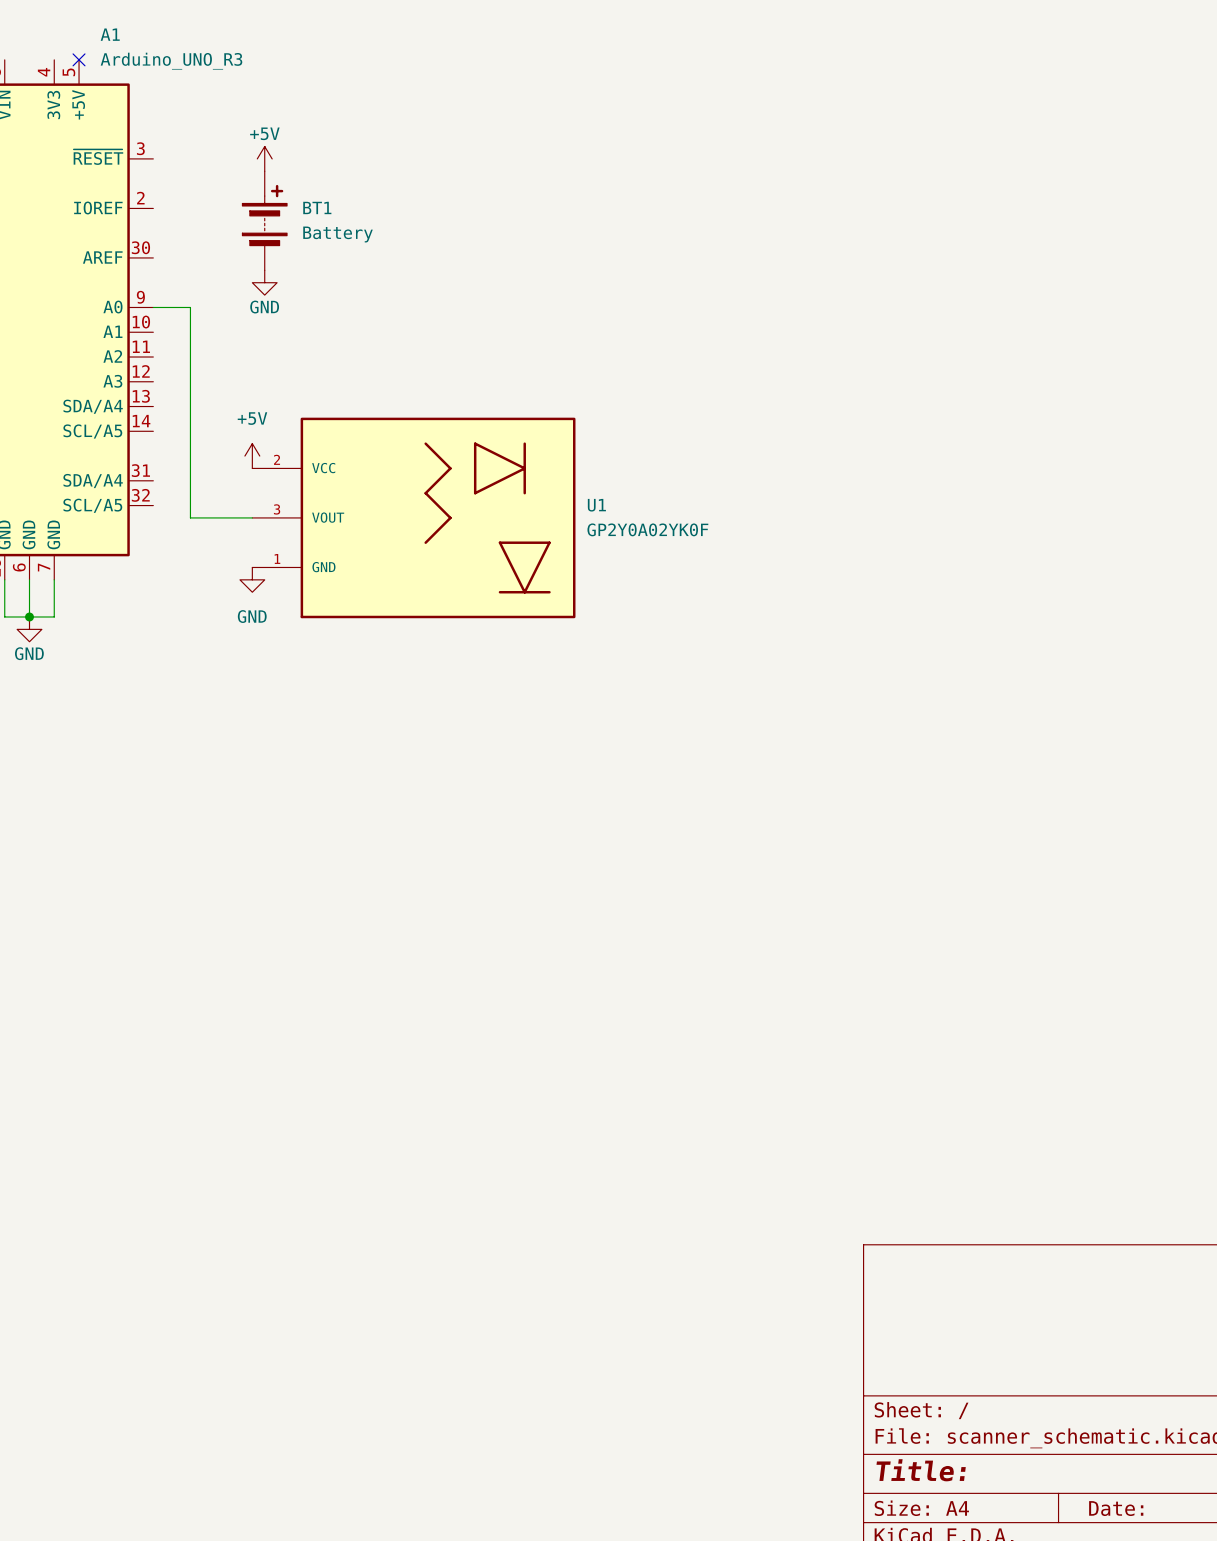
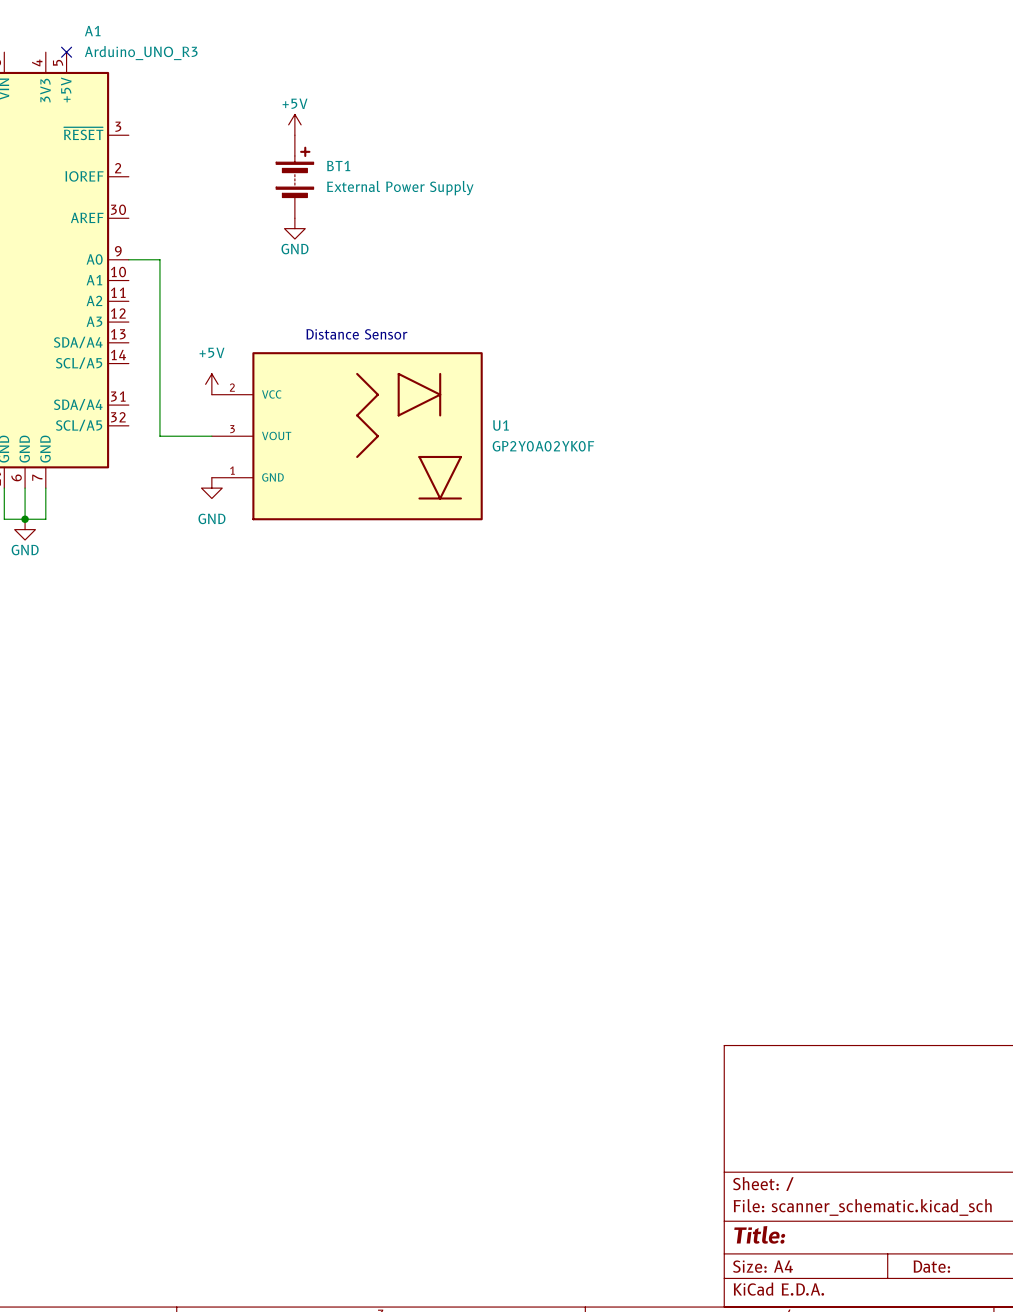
power symbol position: +5V (264, 158) -> +5V (294, 124)
BT1 position: (264, 220) -> (294, 176)
BT1 value: Battery (338, 234) -> External Power Supply (400, 188)
power symbol position: GND (264, 282) -> GND (294, 228)
text: none -> Distance Sensor (356, 334)

